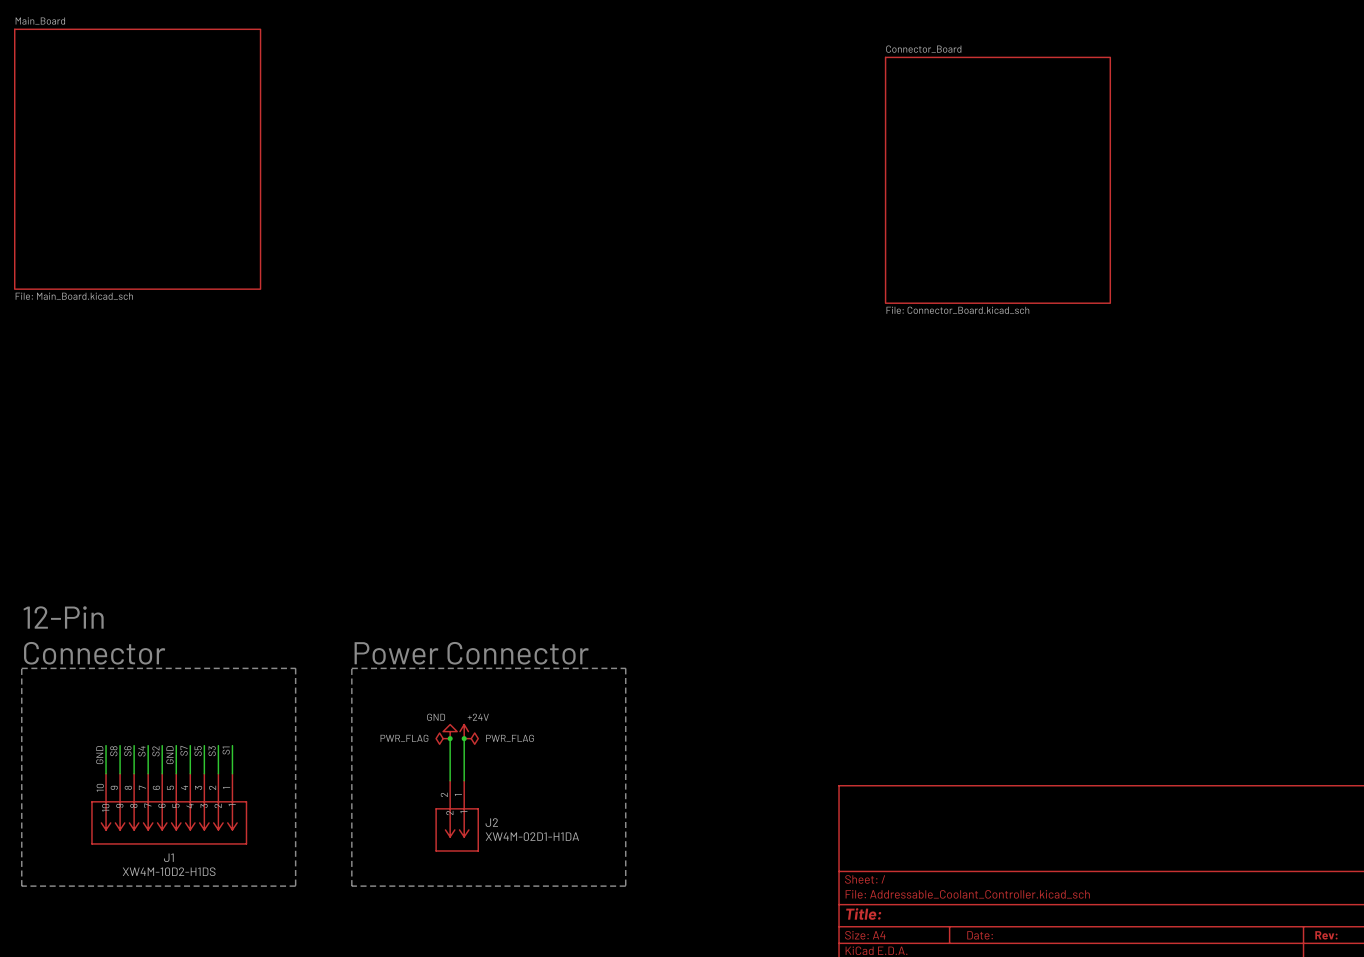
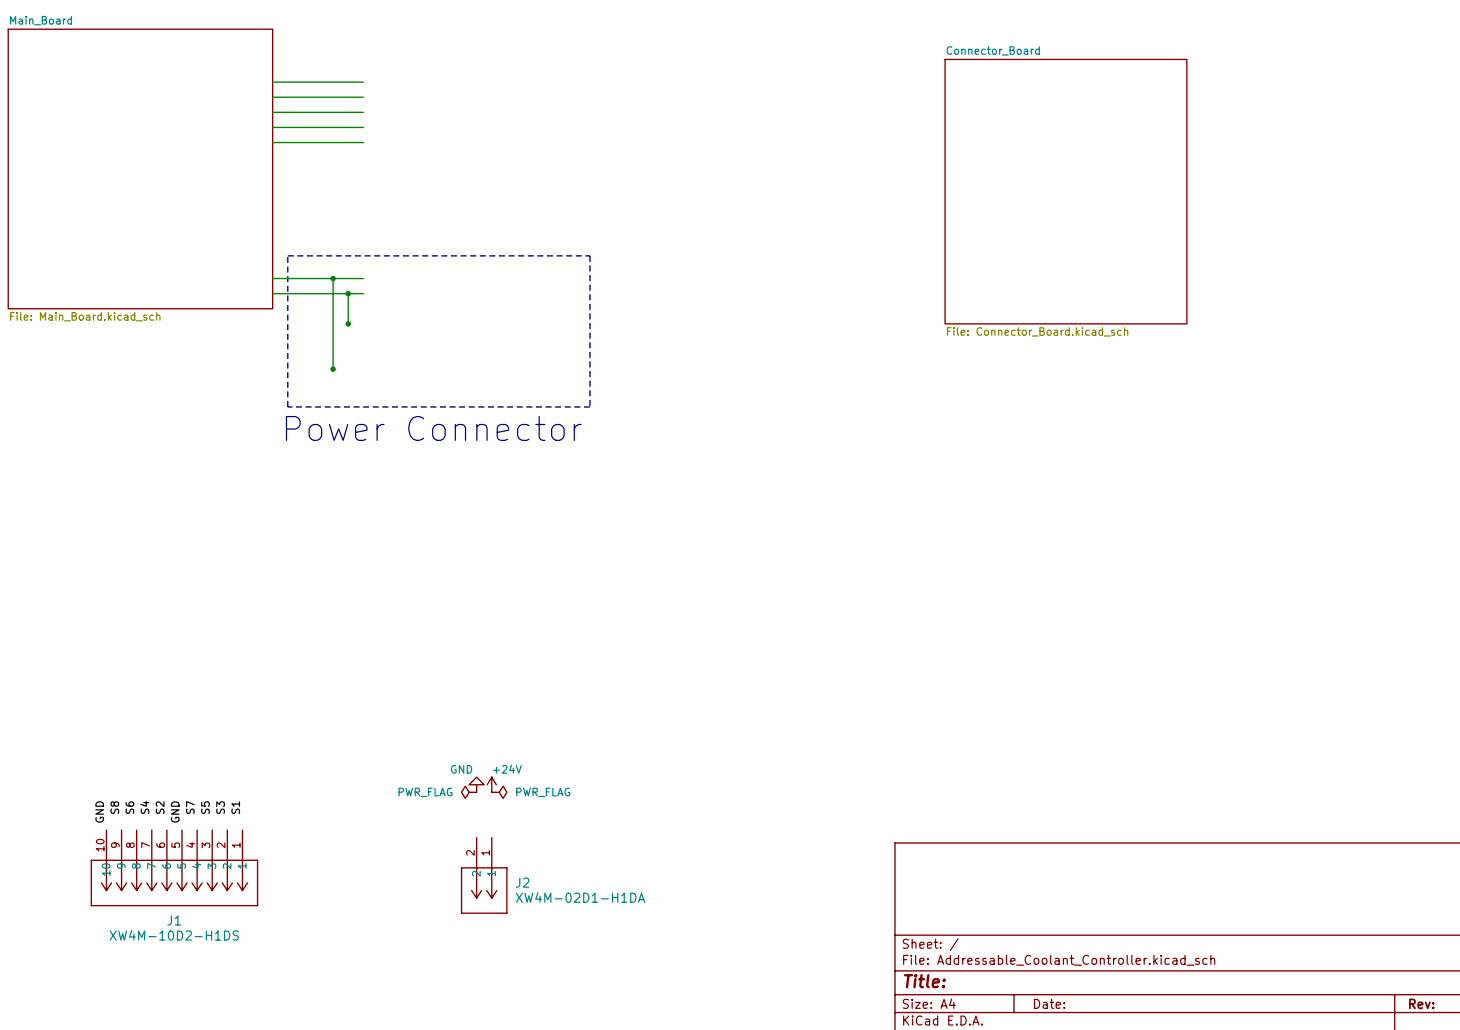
wire: none -> (272, 82) (363, 82)
wire: none -> (272, 97) (363, 97)
wire: none -> (272, 112) (363, 112)
wire: none -> (272, 127) (363, 127)
wire: none -> (272, 142) (363, 142)
line: none -> (287, 255) (589, 255) (589, 406) (287, 406) (287, 255)
wire: none -> (272, 278) (363, 278)
wire: none -> (333, 278) (333, 369)
junction: none -> (333, 278)
wire: none -> (272, 293) (363, 293)
wire: none -> (348, 293) (348, 323)
junction: none -> (348, 293)
junction: none -> (348, 323)
junction: none -> (333, 369)
text: none -> Power Connector (433, 428)
text: 12-Pin (63, 617) -> none
text: Connector (94, 653) -> none
text: Power Connector (471, 653) -> none
line: (21, 668) (295, 668) (295, 886) (21, 886) (21, 668) -> none
line: (351, 668) (625, 668) (625, 886) (351, 886) (351, 668) -> none
wire: (450, 738) (450, 780) -> none
junction: (450, 738) -> none
wire: (464, 738) (464, 780) -> none
junction: (464, 738) -> none
wire: (106, 745) (106, 773) -> none
wire: (120, 745) (120, 773) -> none
wire: (134, 745) (134, 773) -> none
wire: (148, 745) (148, 773) -> none
wire: (162, 745) (162, 773) -> none
wire: (176, 745) (176, 773) -> none
wire: (190, 745) (190, 773) -> none
wire: (204, 745) (204, 773) -> none
wire: (218, 745) (218, 773) -> none
wire: (232, 745) (232, 773) -> none

